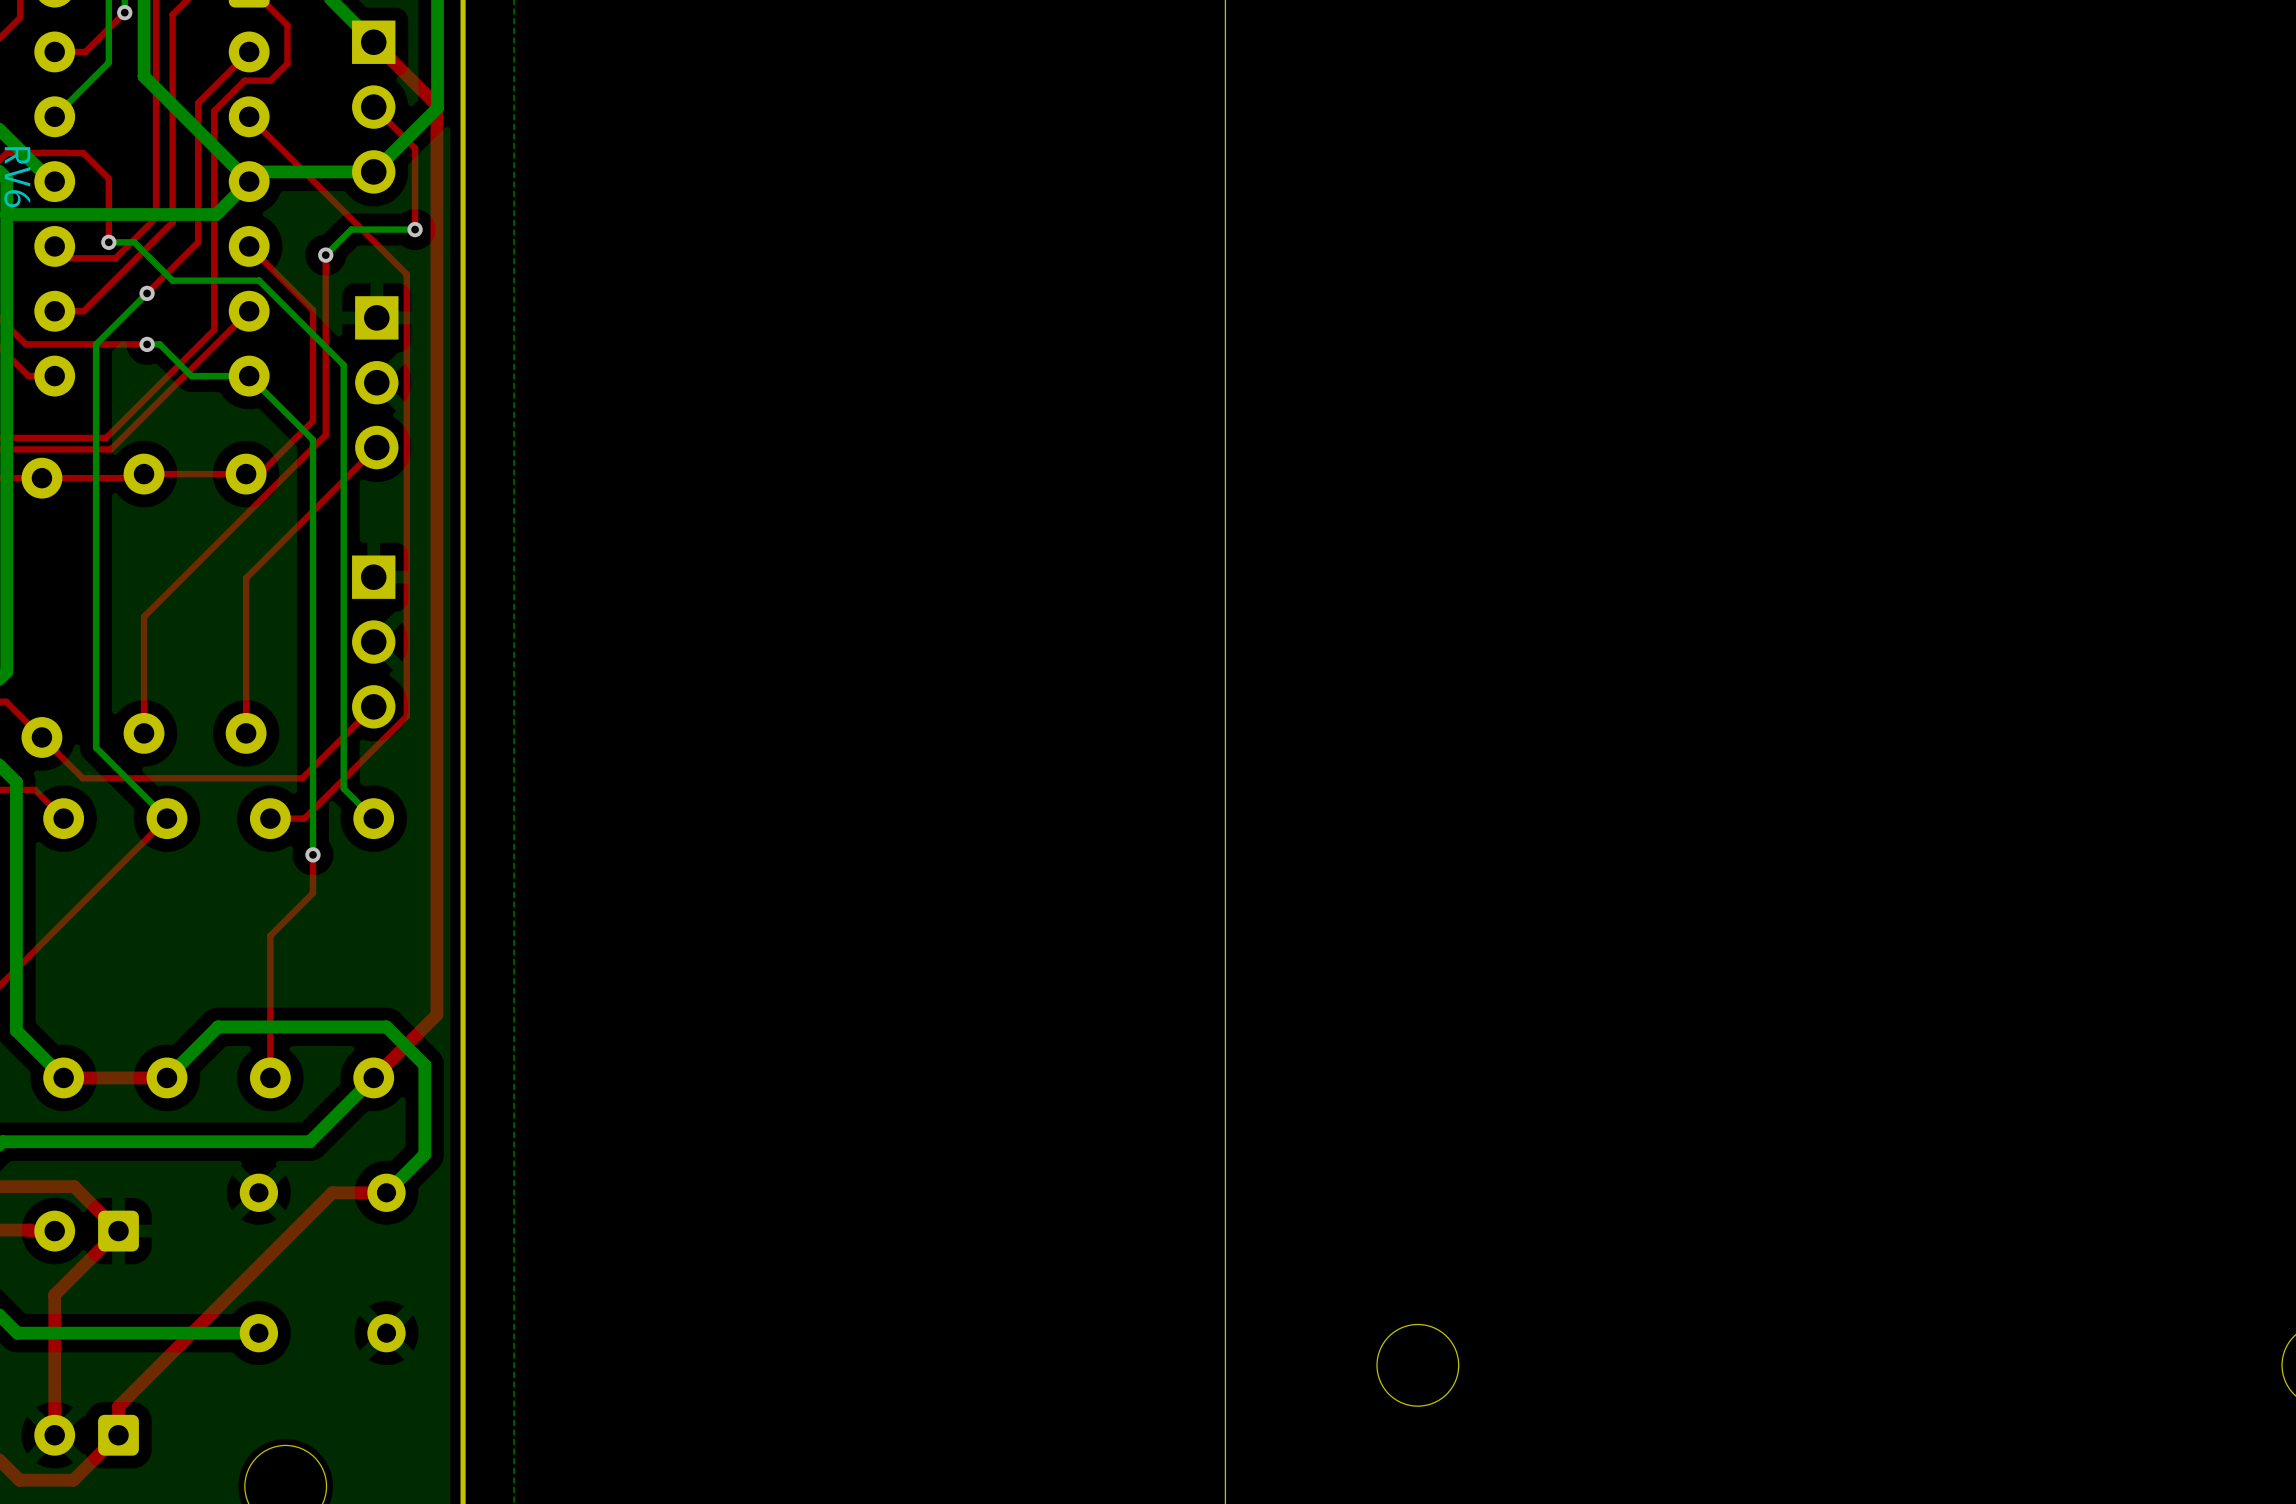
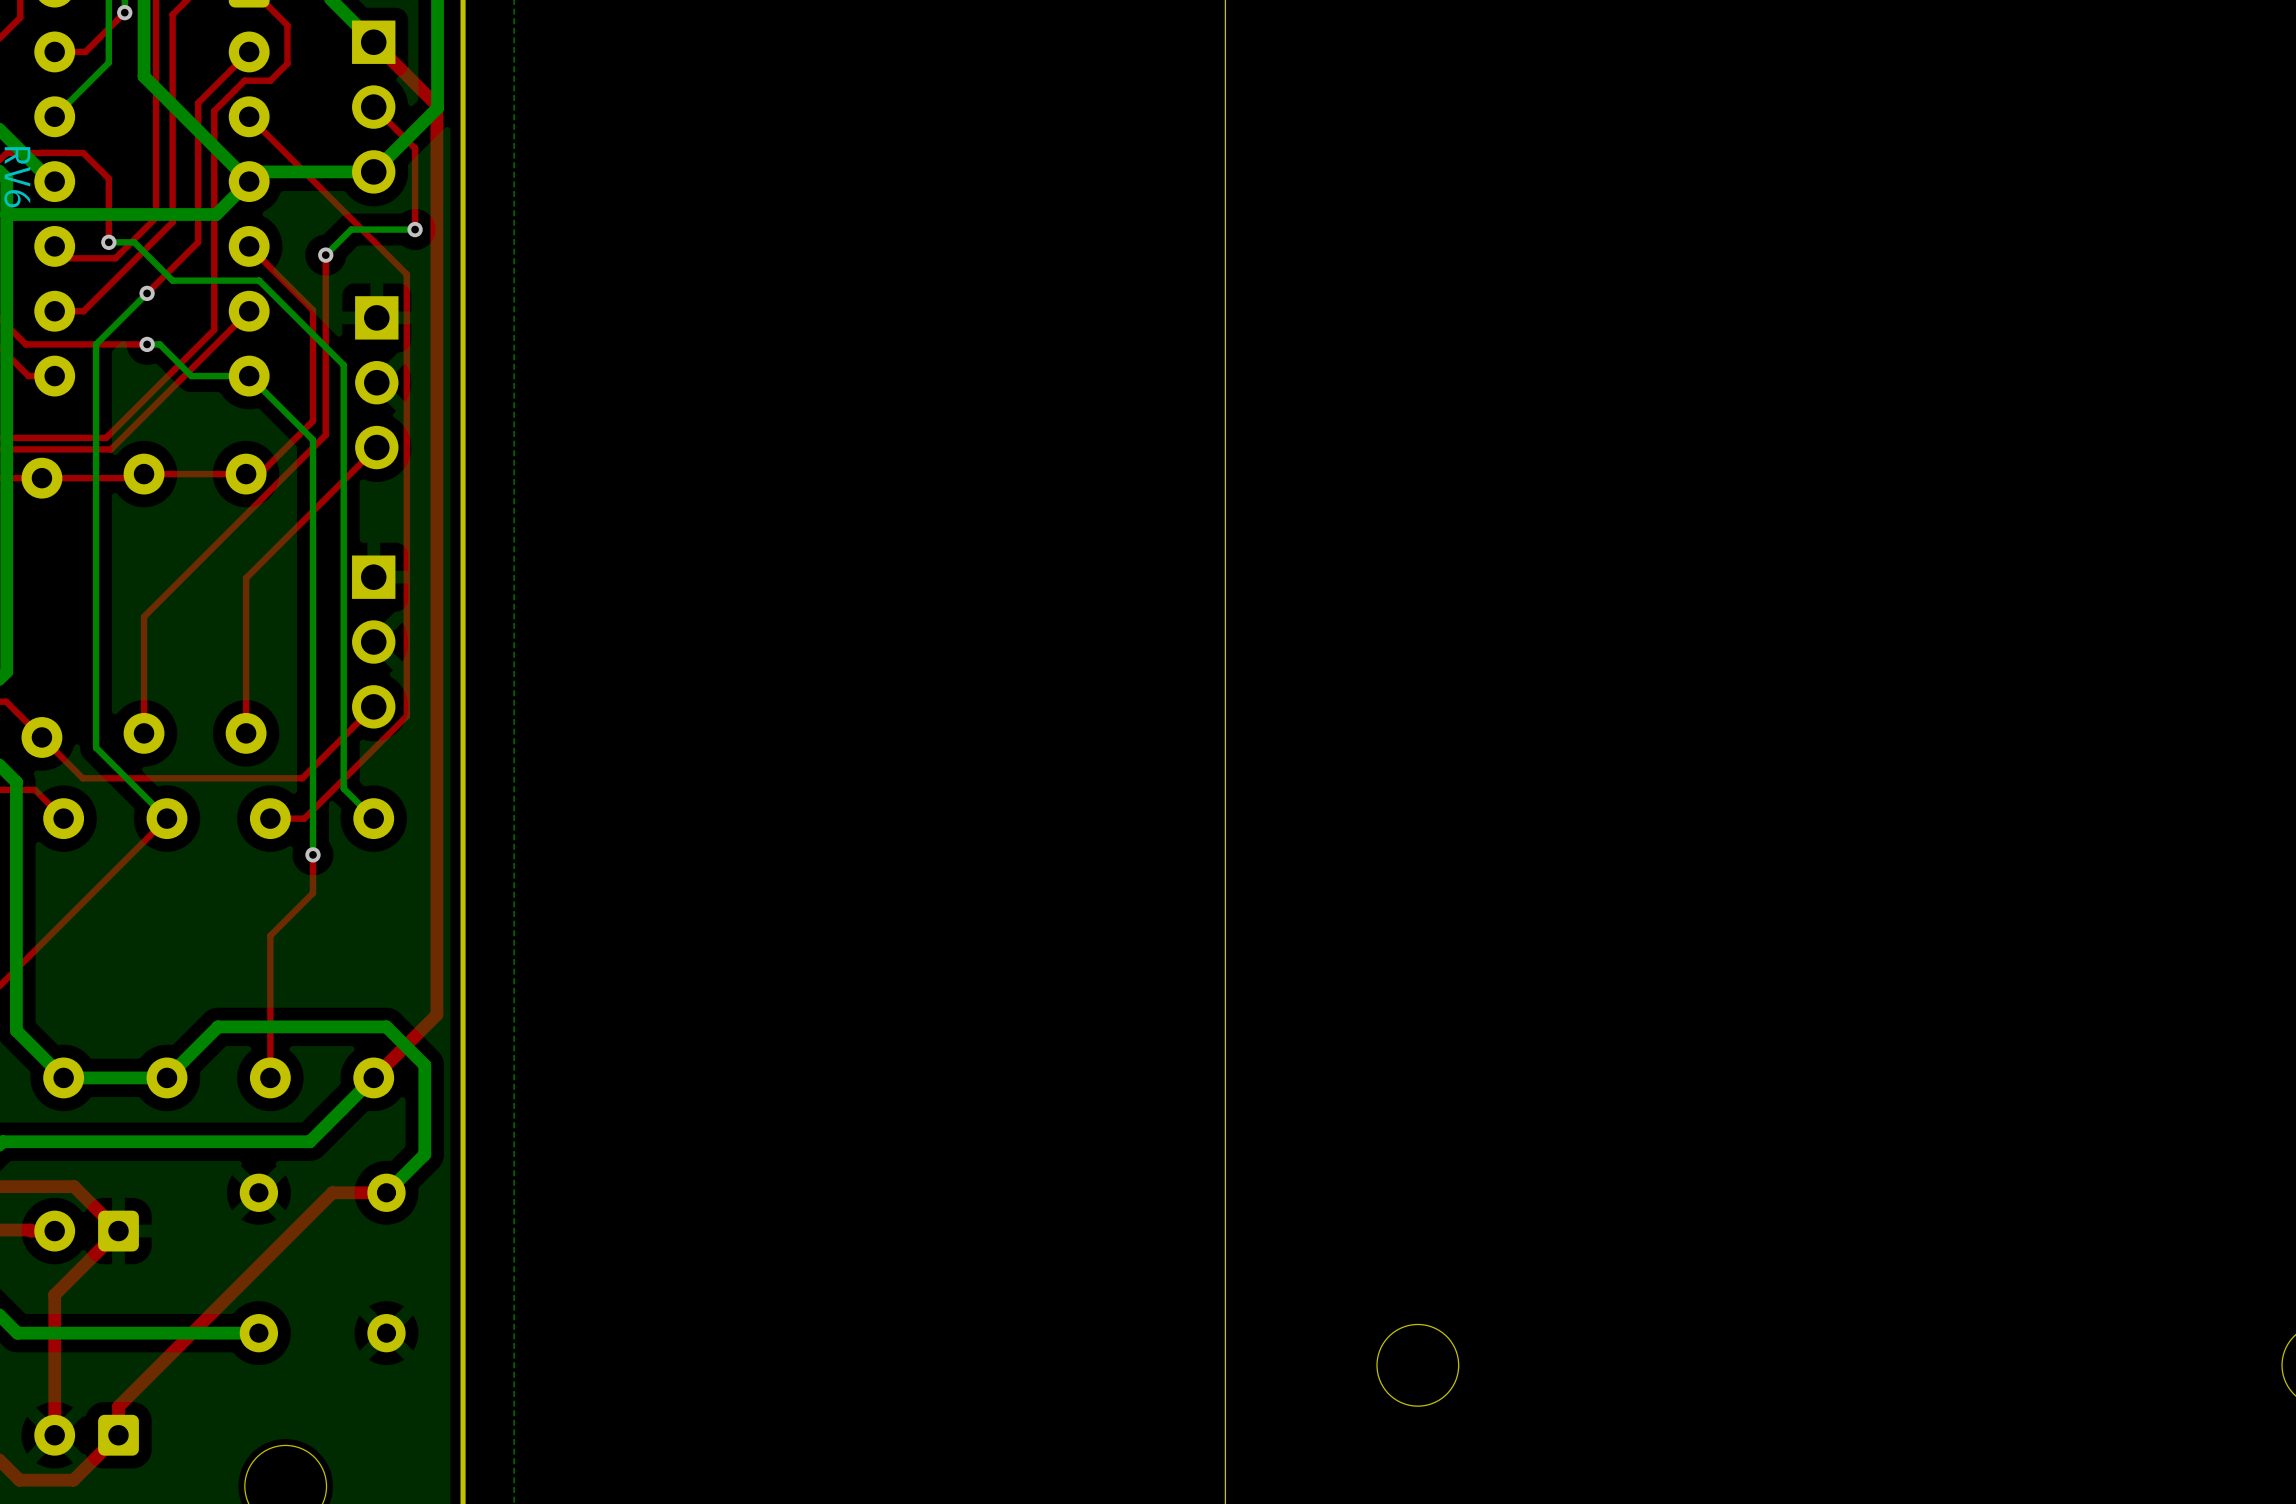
top track: (167, 1077) (63, 1077) -> none
bottom track: none -> (167, 1077) (63, 1077)

